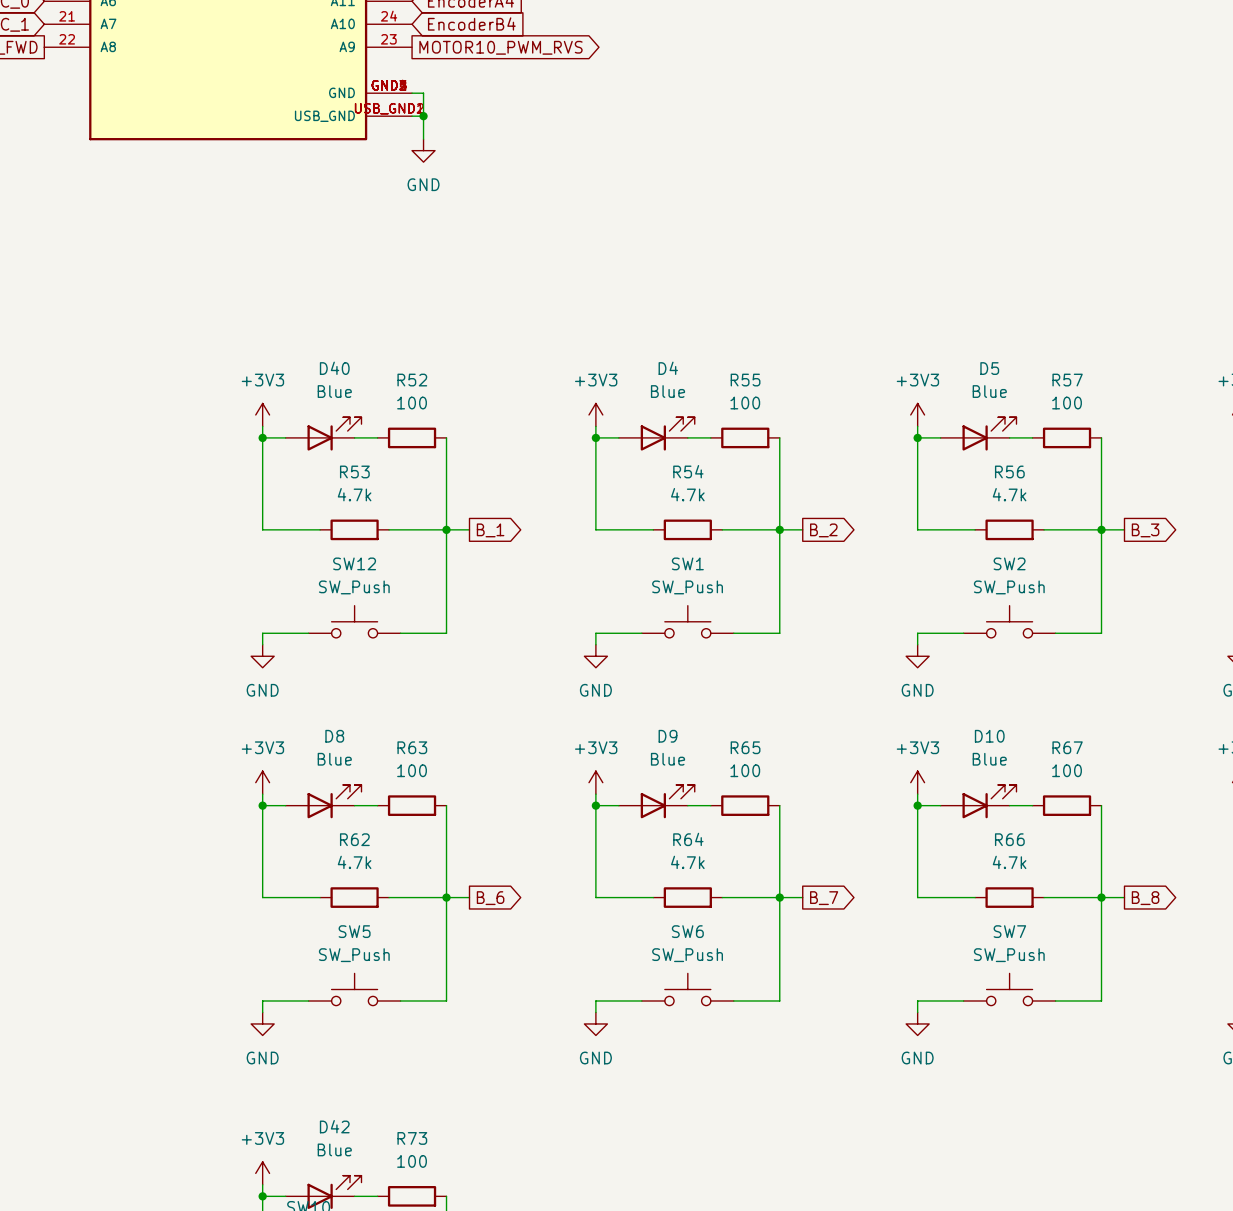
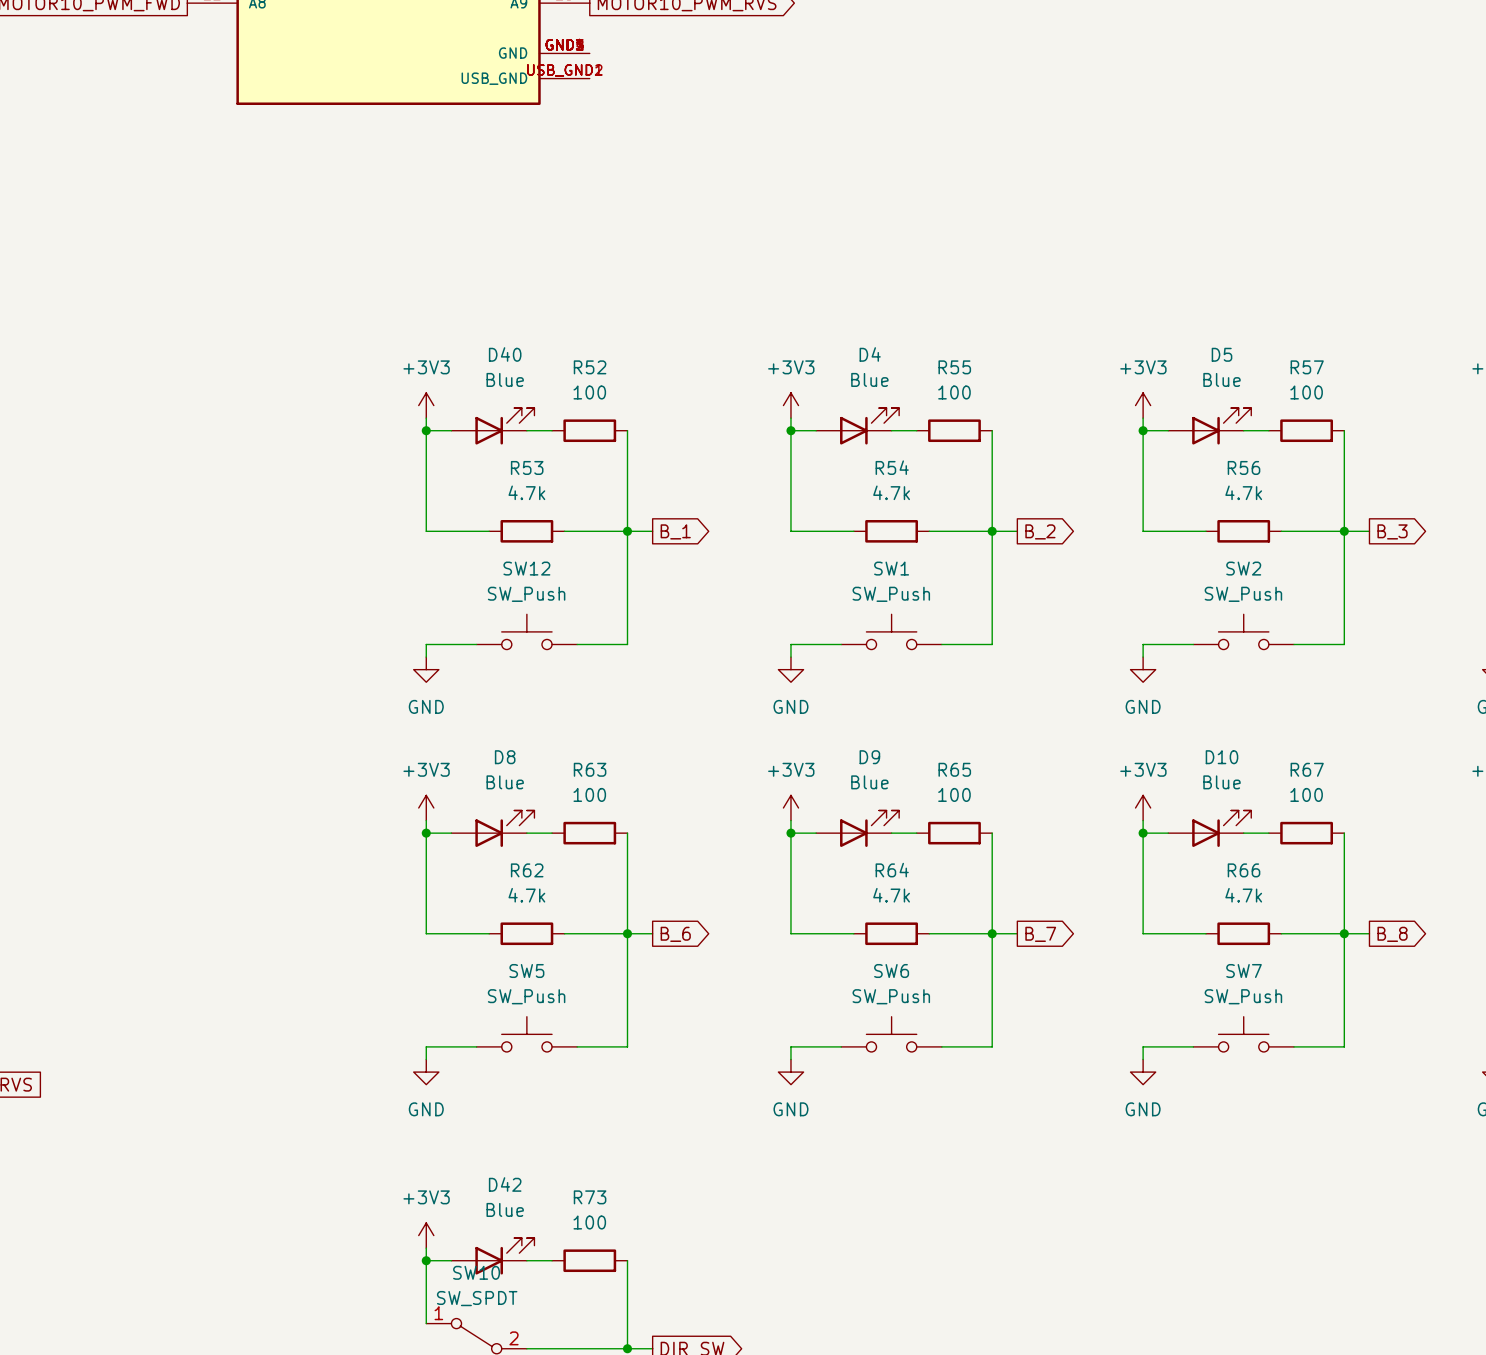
wire: (412, 93) (423, 93) (423, 139) -> none
wire: (412, 116) (423, 116) -> none
junction: (423, 116) -> none
power symbol: GND (423, 150) -> none

